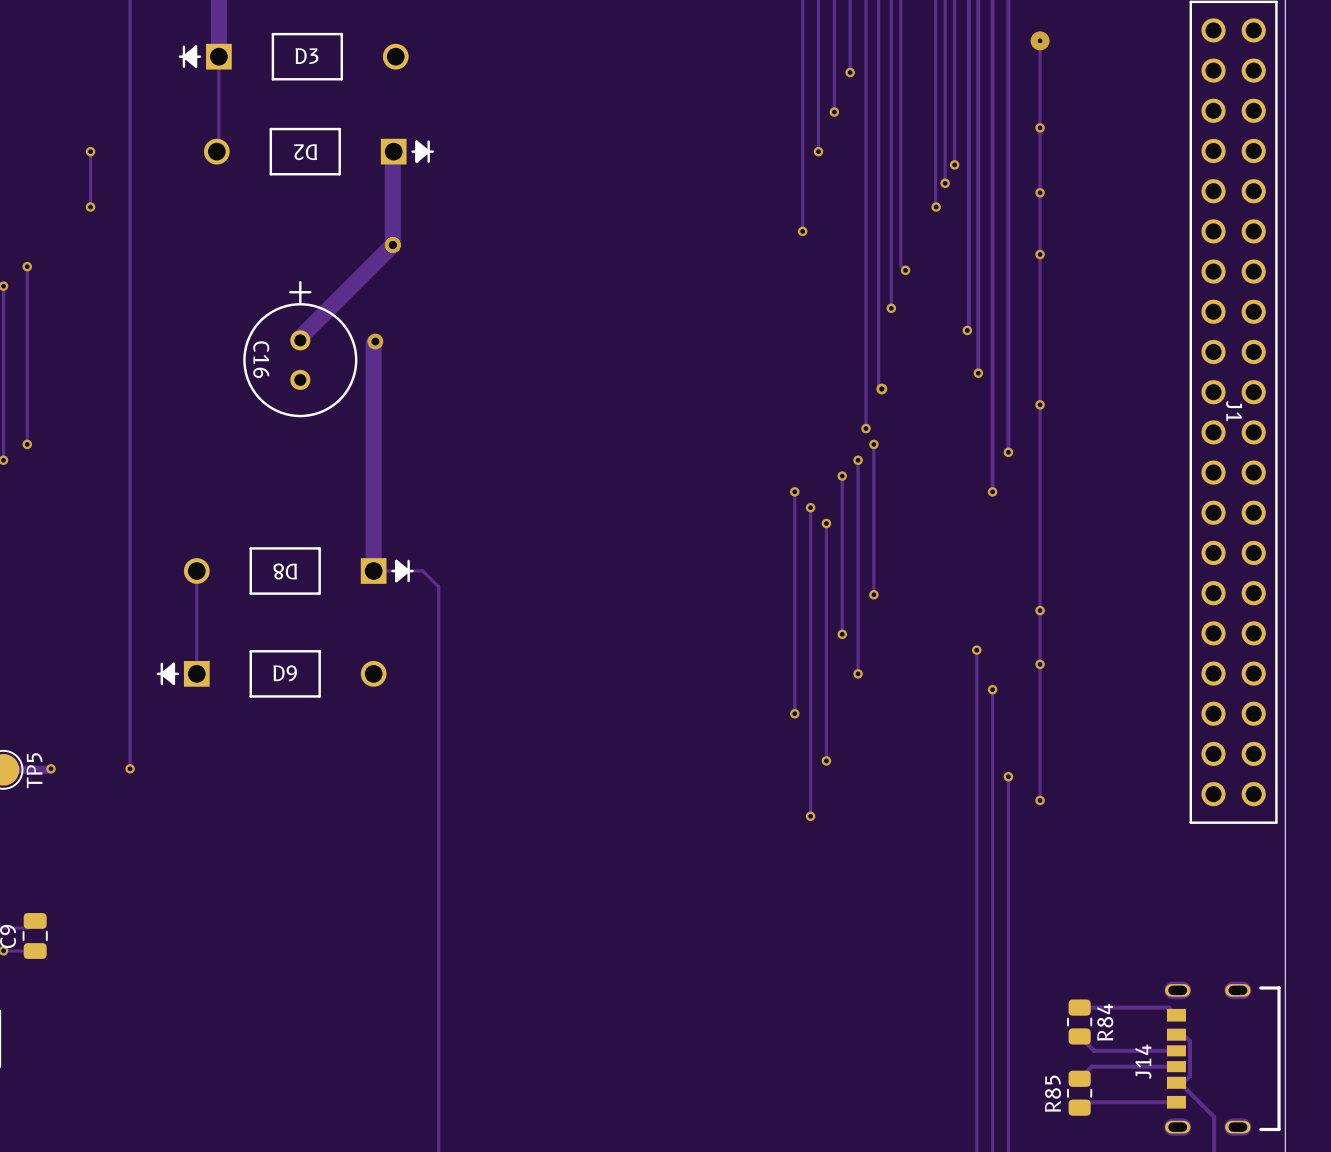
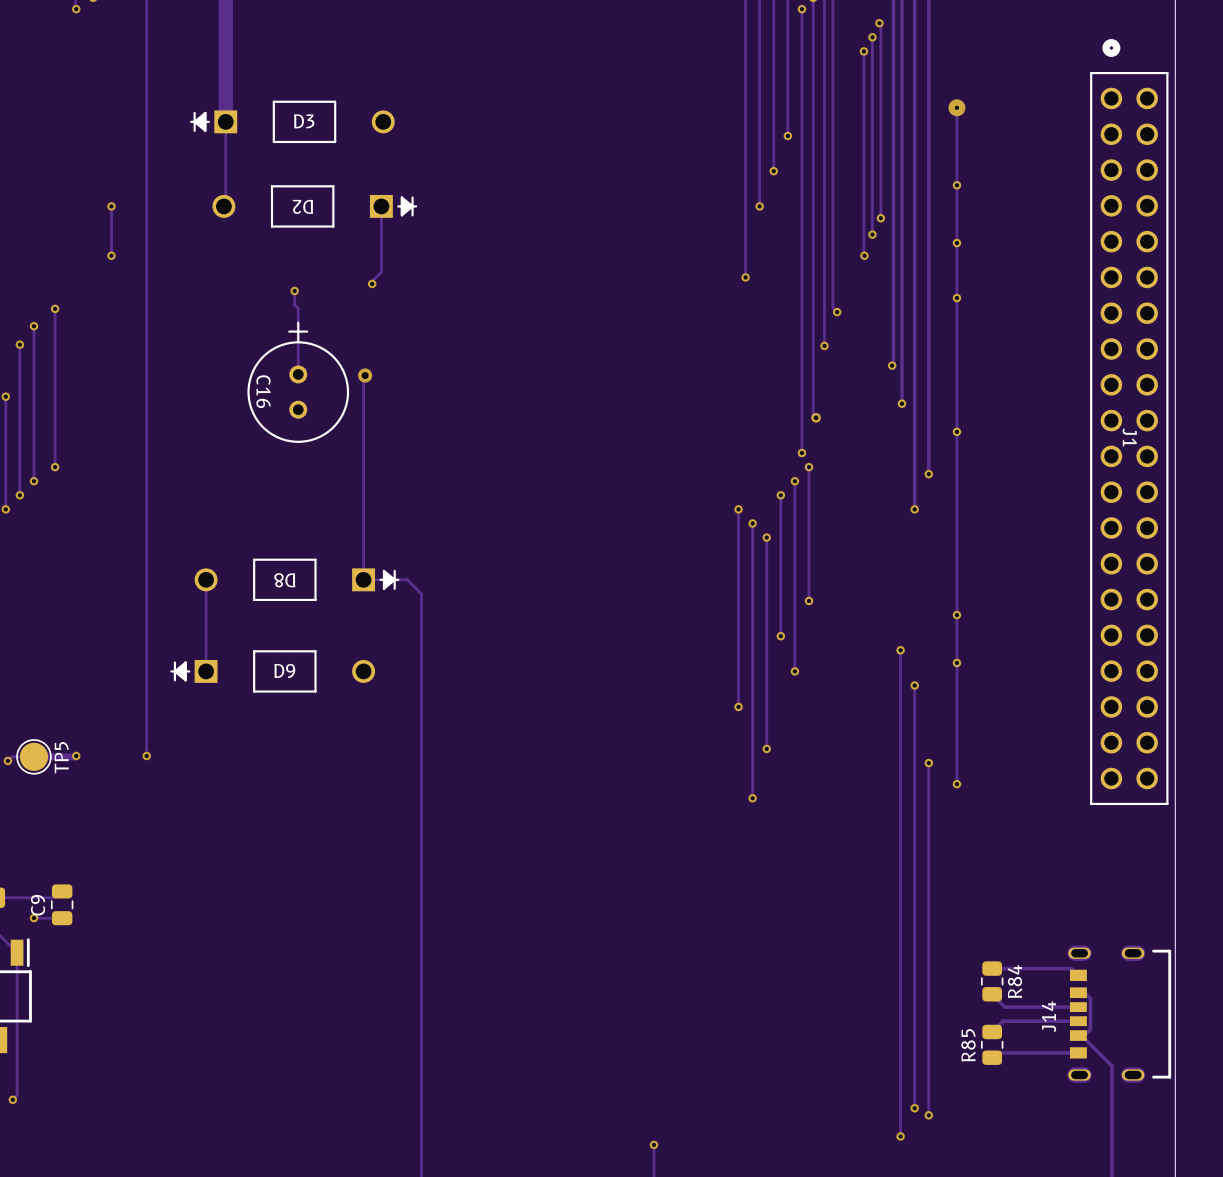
track: (393, 151) (392, 245) (299, 338) (300, 340) -> (381, 206) (381, 272) (372, 281) (372, 283)
via size: [384, 237, 401, 253] -> [367, 279, 377, 289]
track: none -> (294, 290) (294, 305) (298, 308) (298, 374)
via: none -> (294, 290)
track width: thick (373, 343) (373, 571) -> thin (363, 377) (363, 579)

